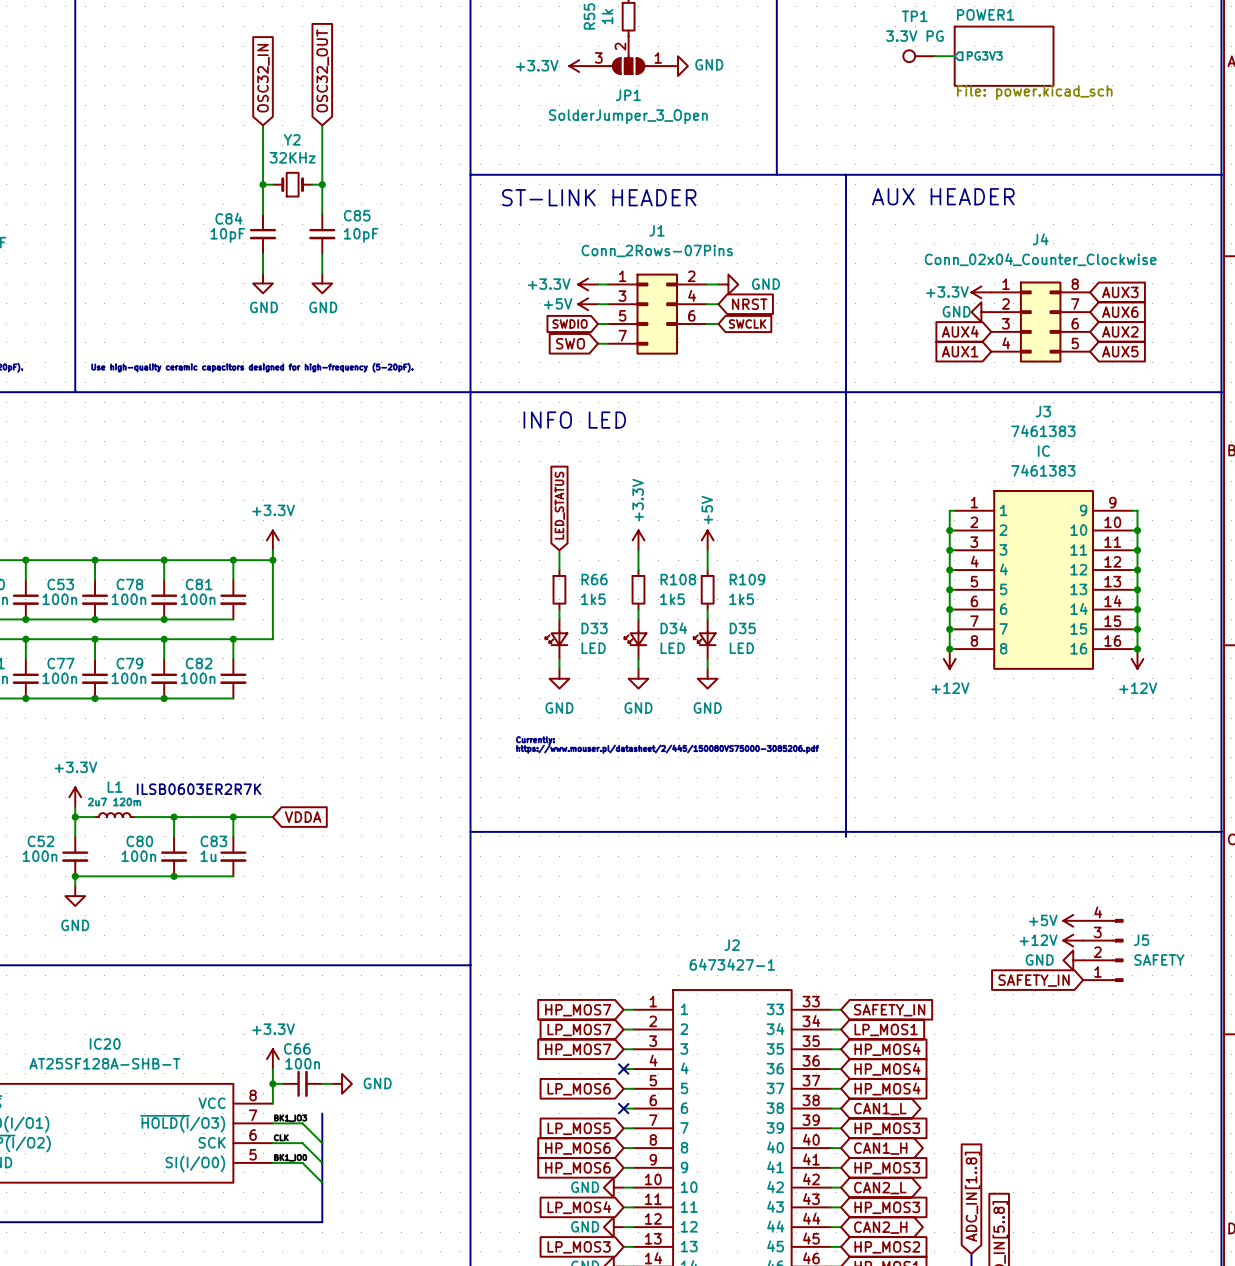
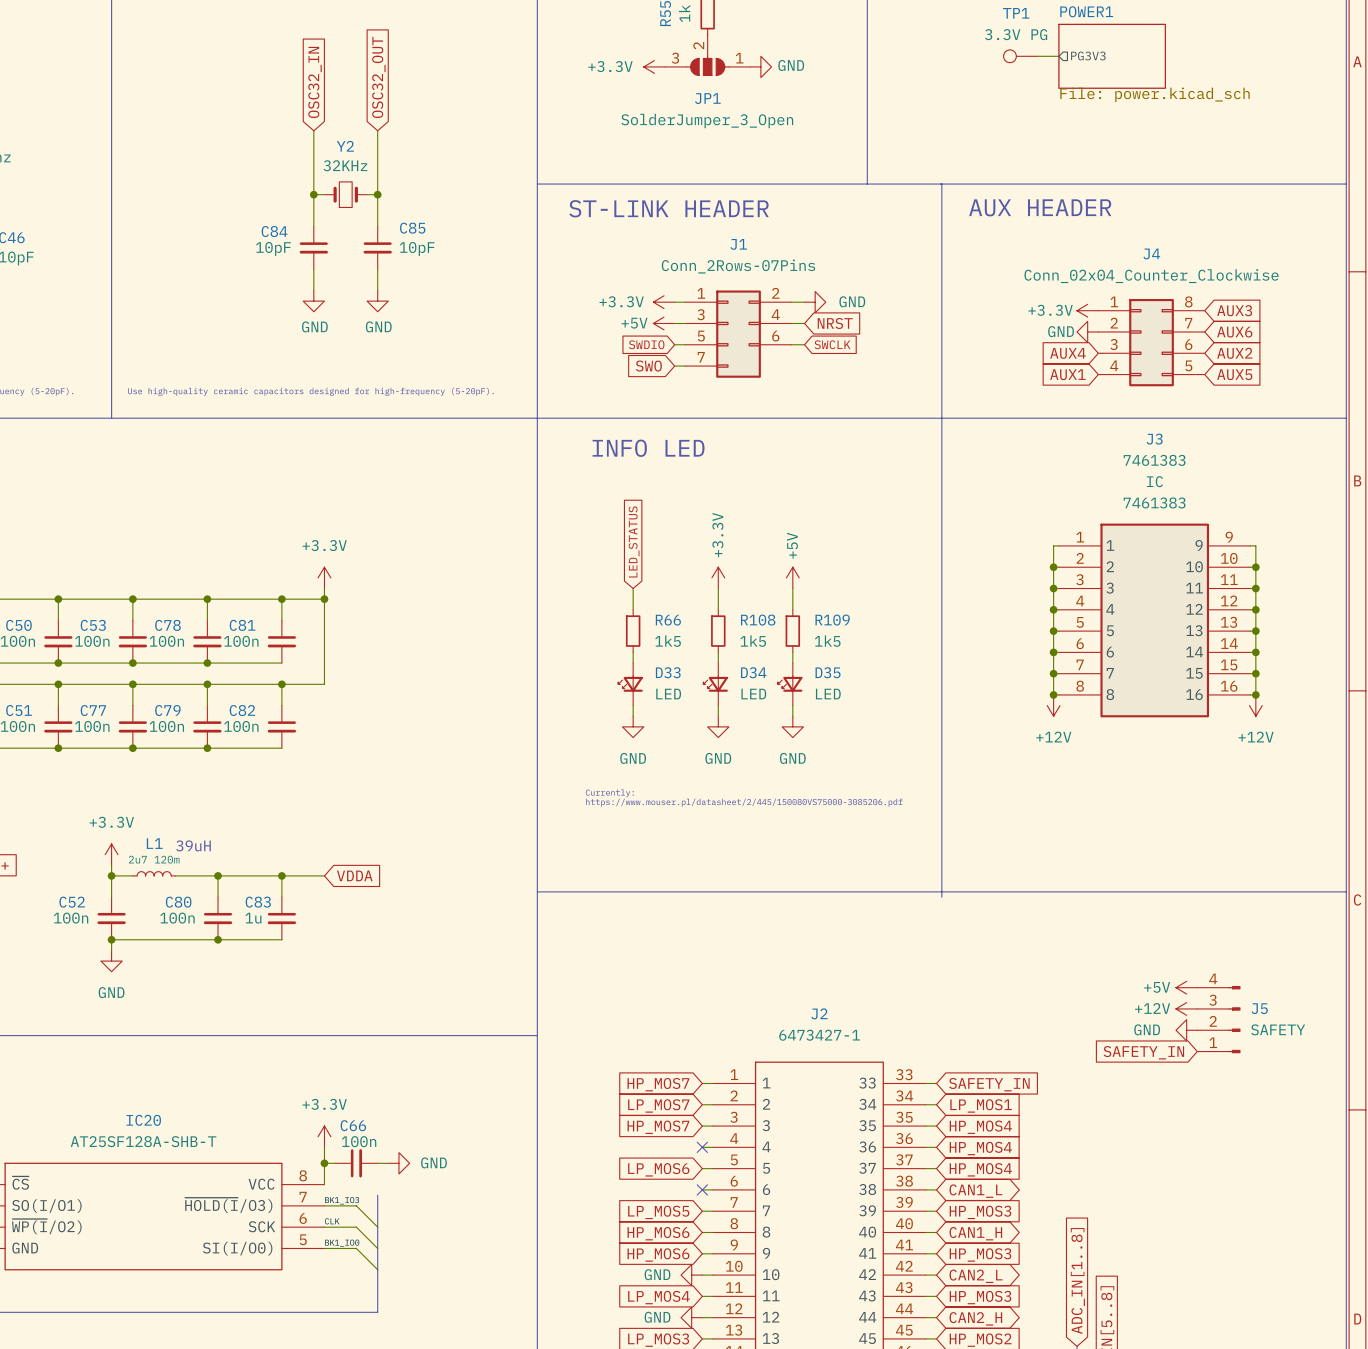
text: ILSB0603ER2R7K (199, 789) -> 39uH (193, 845)

